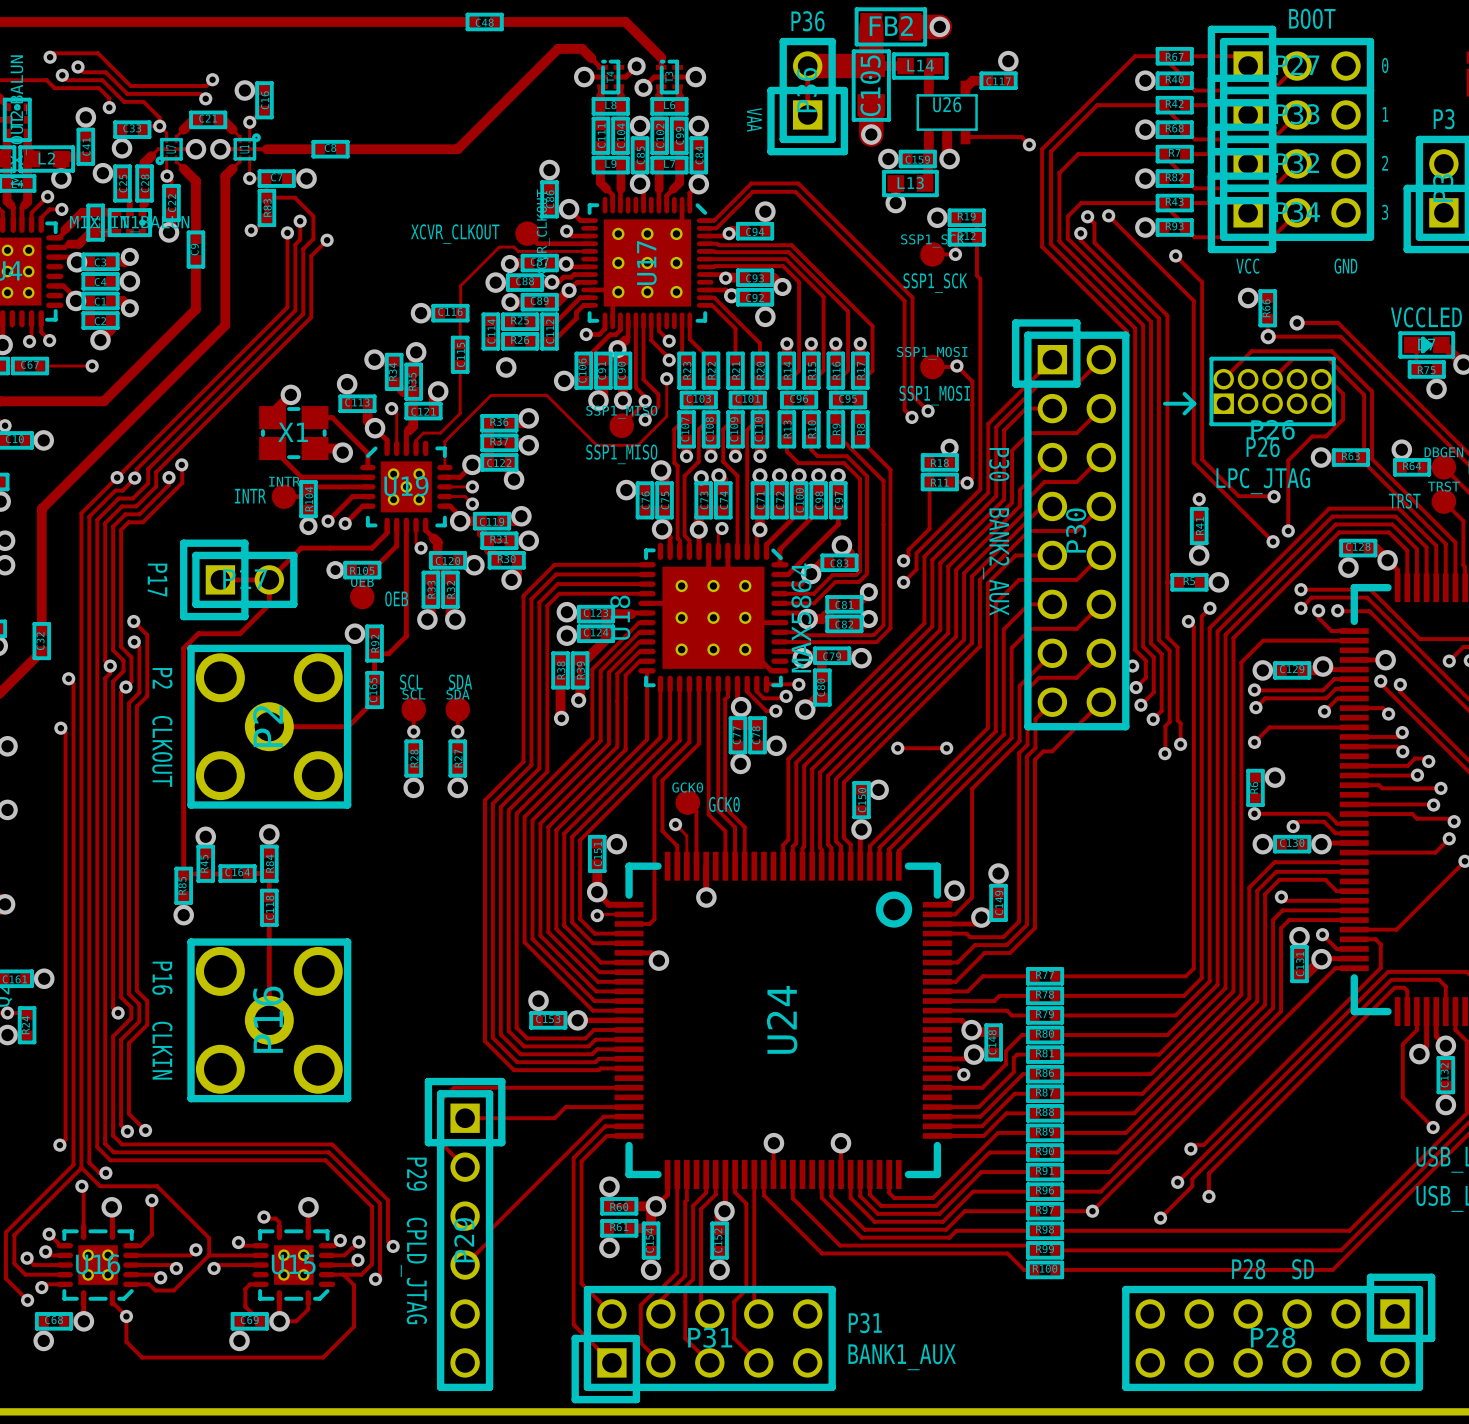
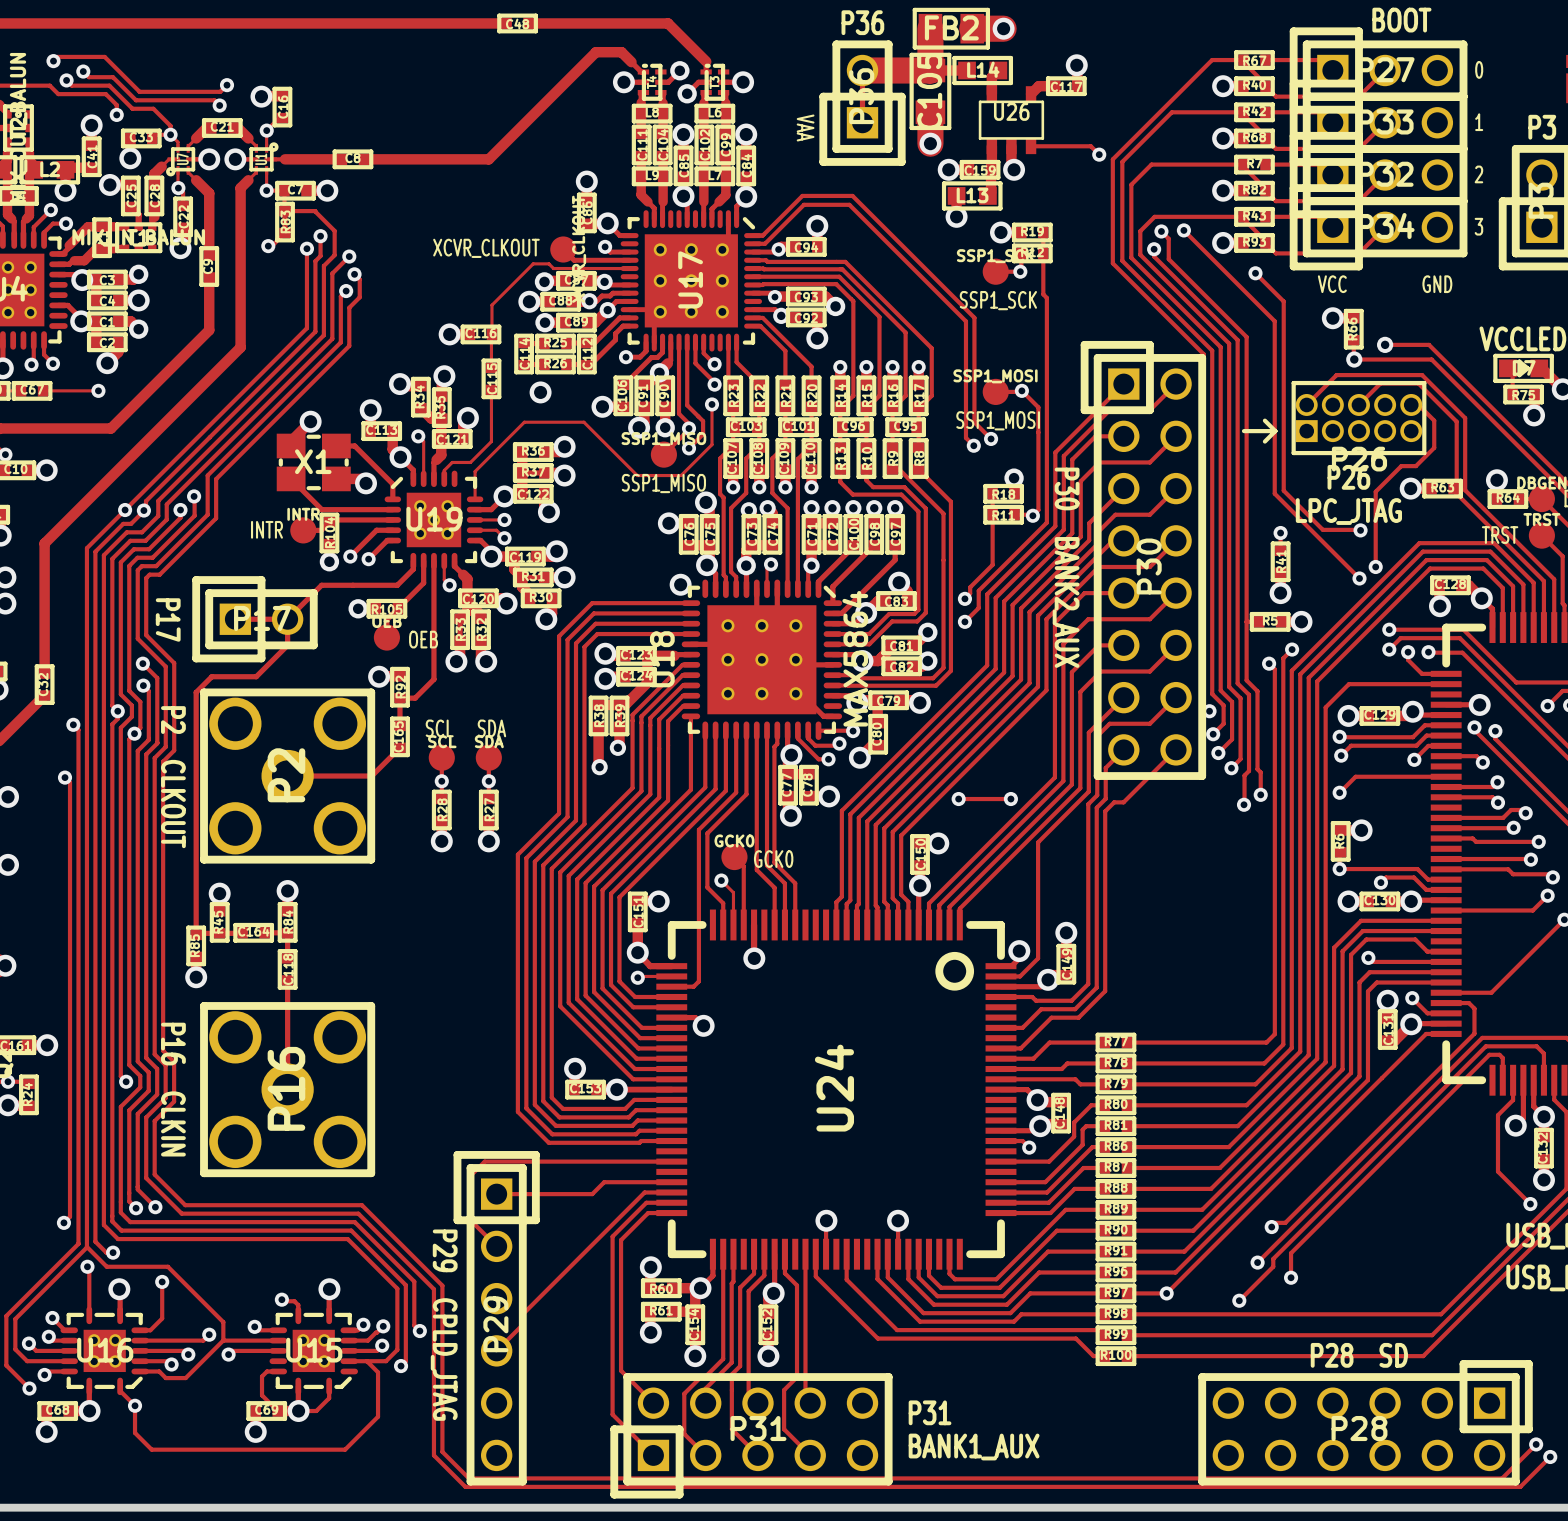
track: none -> (354, 274) (359, 279) (359, 297) (349, 307) (349, 345) (216, 479) (216, 518) (159, 574) (149, 574) (146, 578) (146, 635) (174, 663) (174, 750) (163, 761) (163, 1050) (174, 1061) (174, 1101) (154, 1121) (154, 1174) (185, 1205) (361, 1205) (442, 1285) (442, 1451) (468, 1478) (1502, 1478) (1536, 1444)
via: none -> (354, 274)
track: none -> (346, 291) (340, 296) (340, 342) (207, 475) (207, 514) (156, 566) (141, 566) (137, 570) (137, 638) (165, 666) (165, 746) (154, 758) (154, 1054) (165, 1065) (165, 1098) (146, 1117) (146, 1178) (181, 1213) (358, 1213) (433, 1289) (433, 1455) (465, 1486) (1520, 1486) (1550, 1456)
via: none -> (346, 291)
via: none -> (680, 584)
via: none -> (1536, 1444)
via: none -> (1550, 1456)

